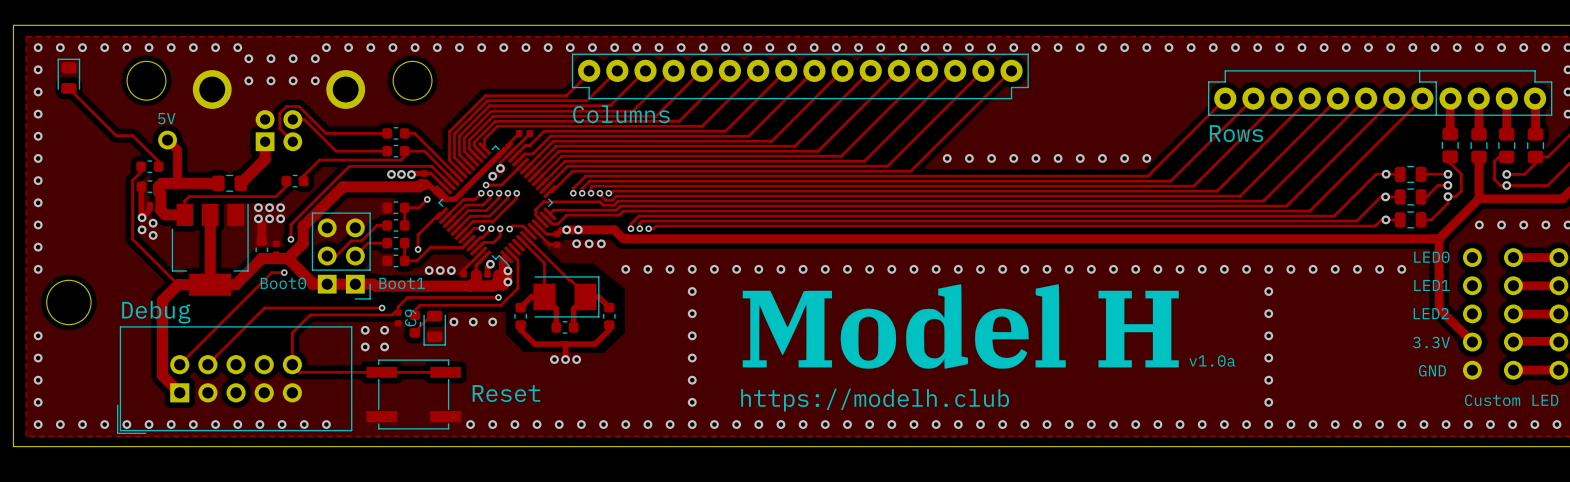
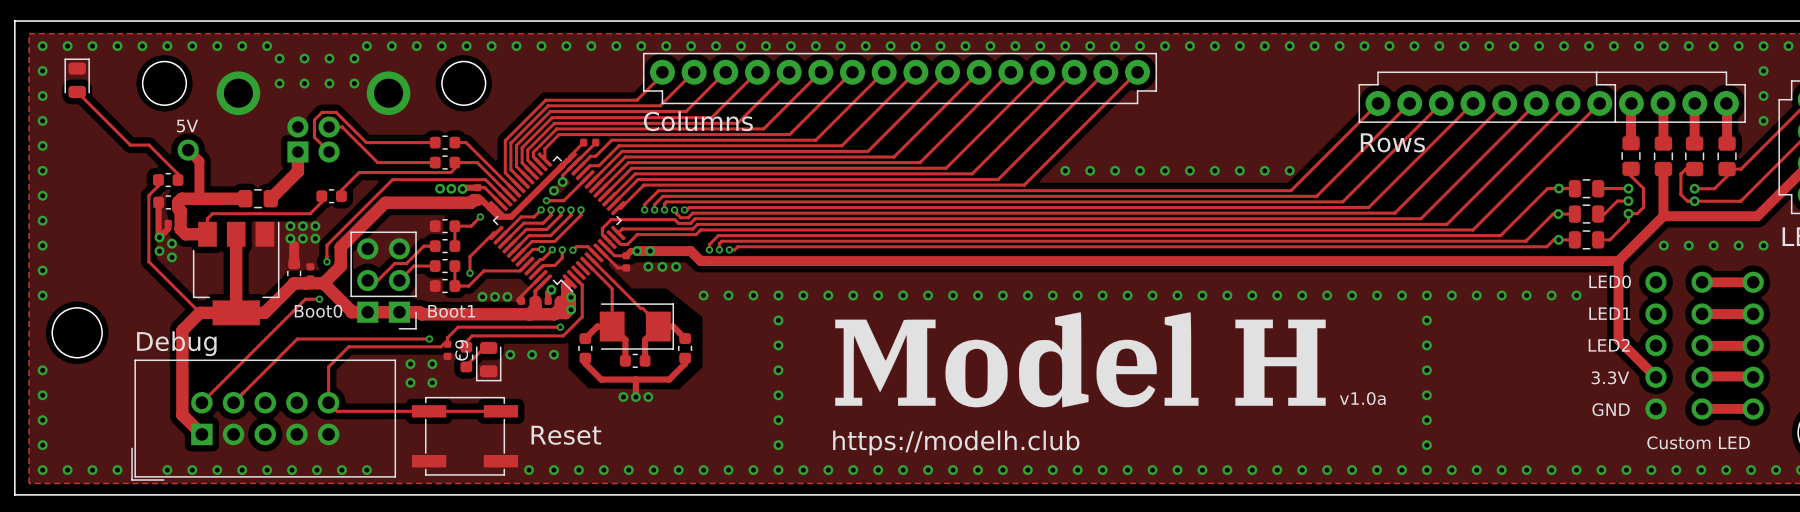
via: (126, 424) -> none

